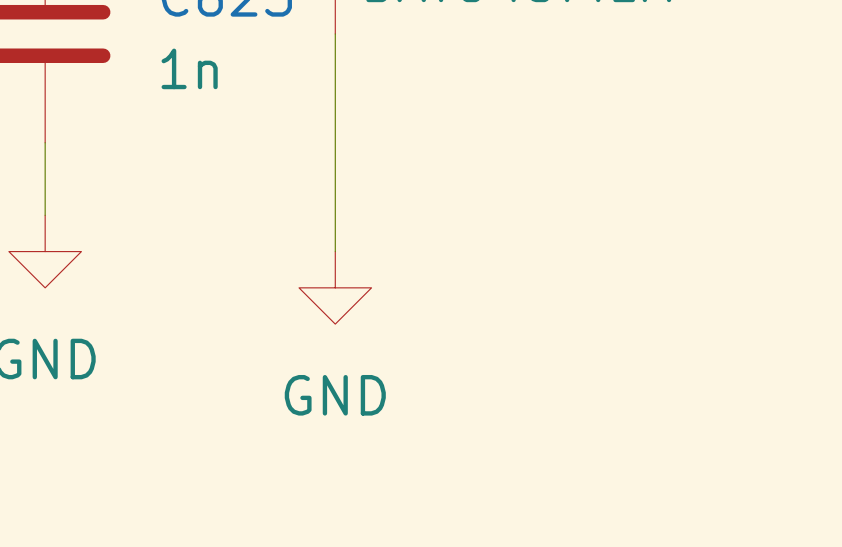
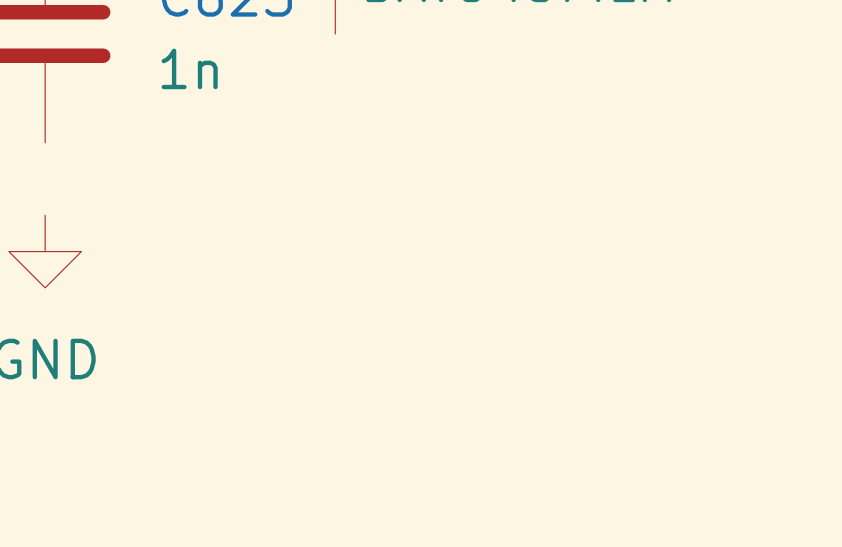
wire: (335, 33) (335, 251) -> none
wire: (45, 142) (45, 215) -> none
power symbol: GND (335, 287) -> none

